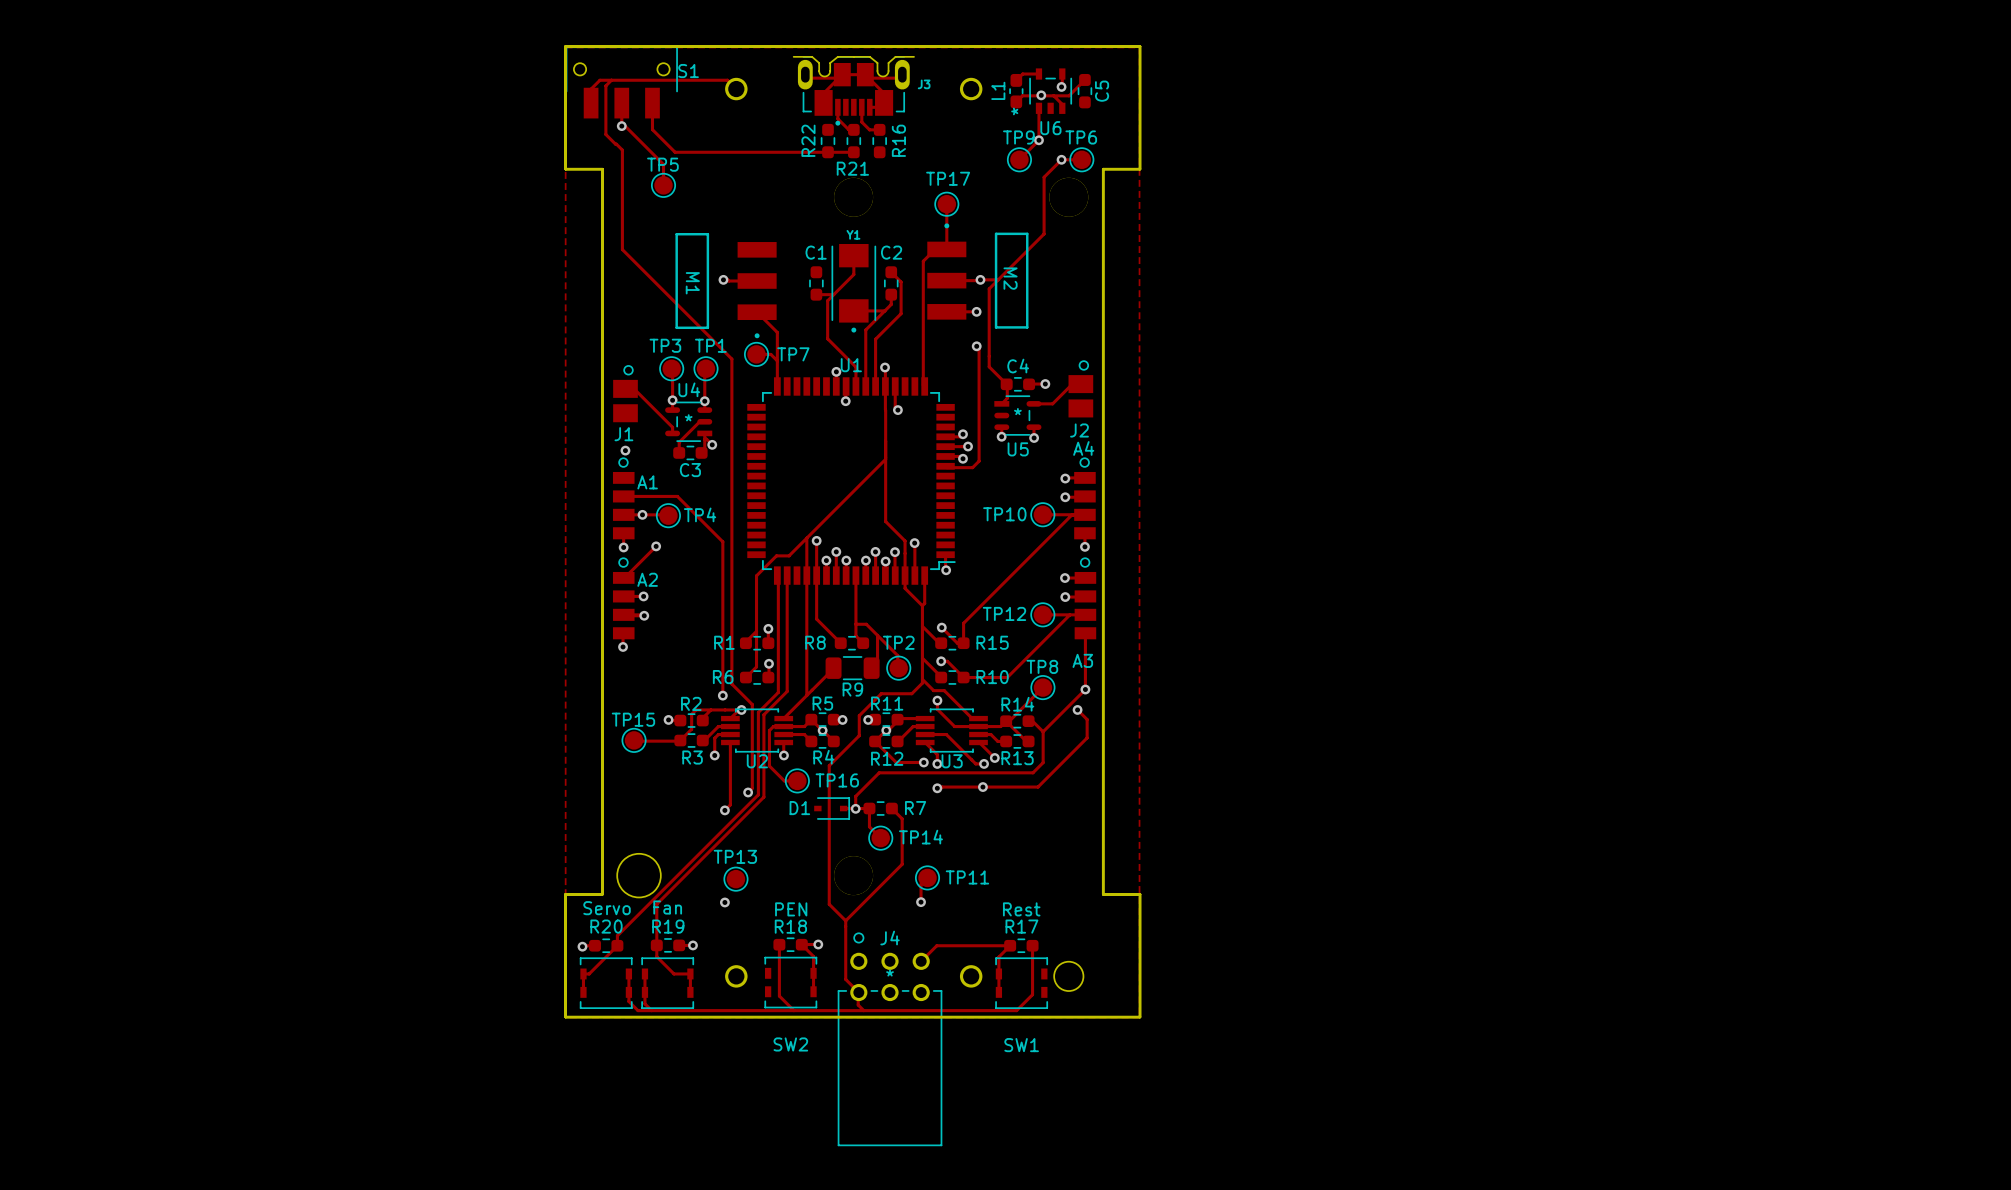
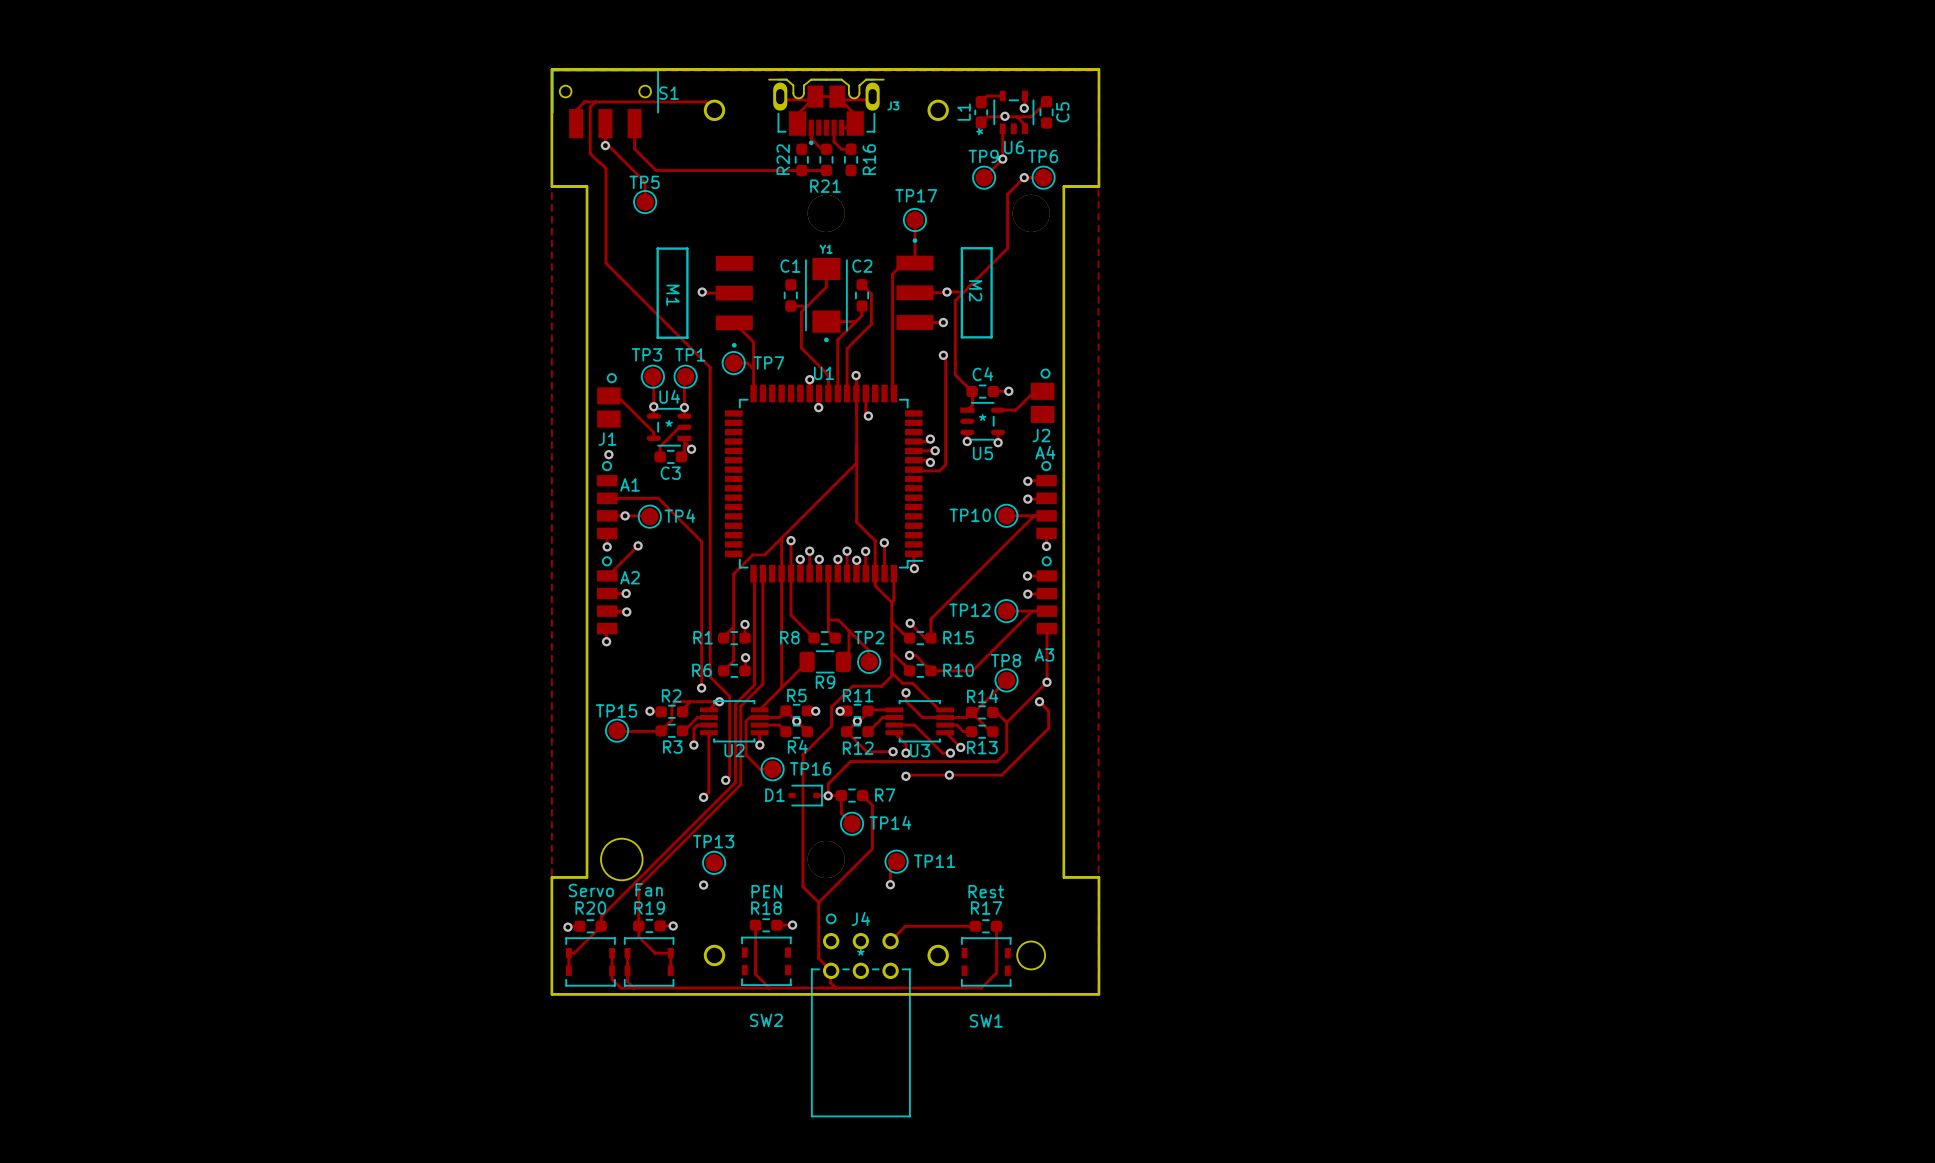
track: (801, 944) (813, 956) (813, 991) -> none
track: (1010, 945) (998, 956) (998, 992) -> none

